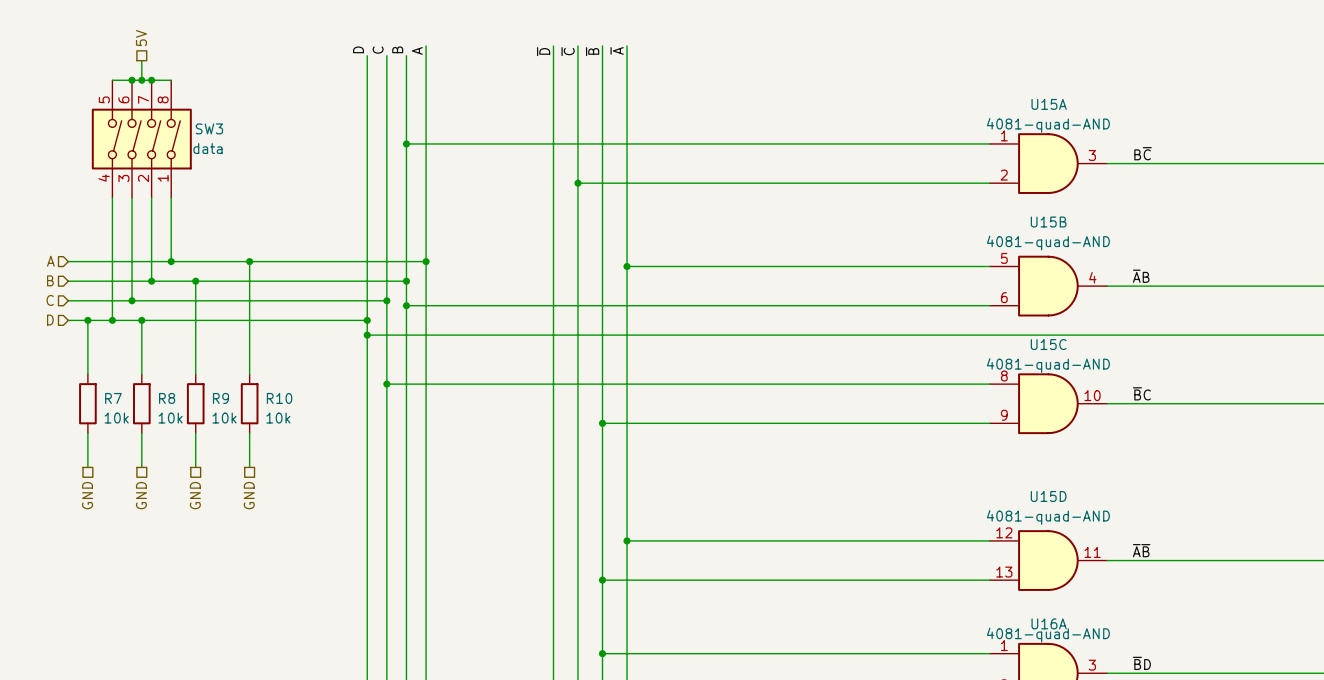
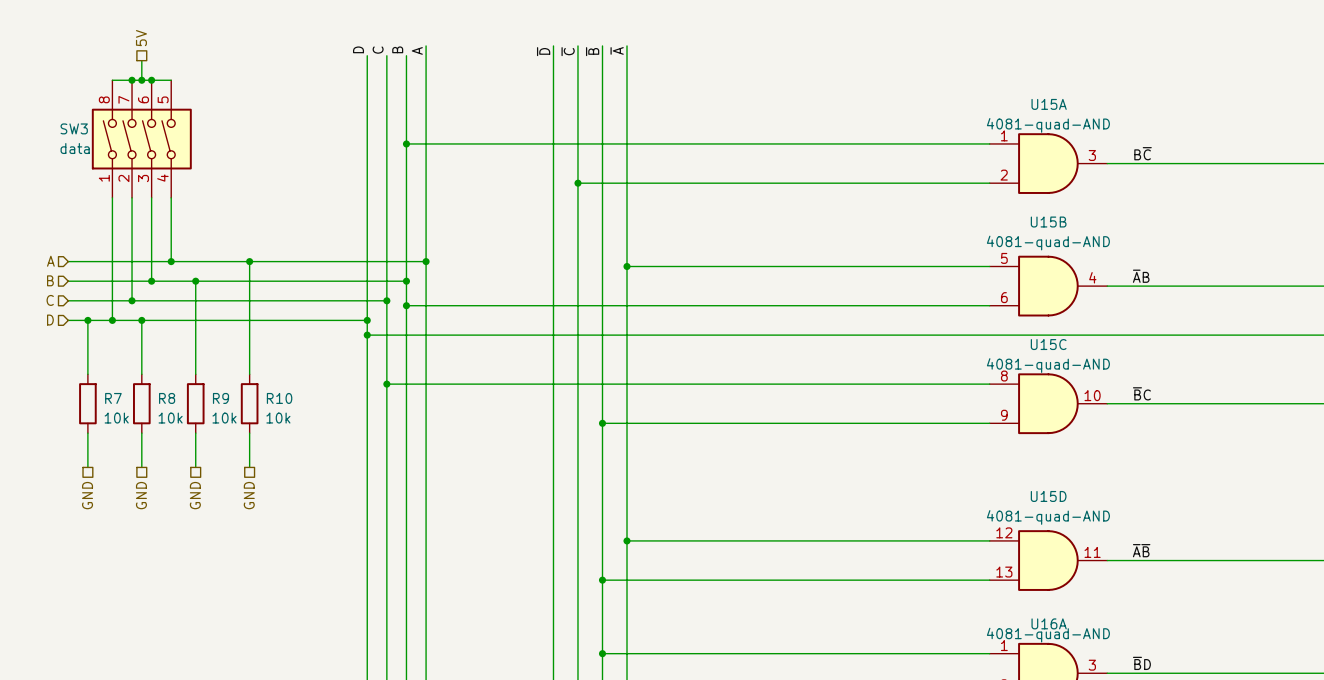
SW3 flip: as is (141, 139) -> left-right (141, 139)

